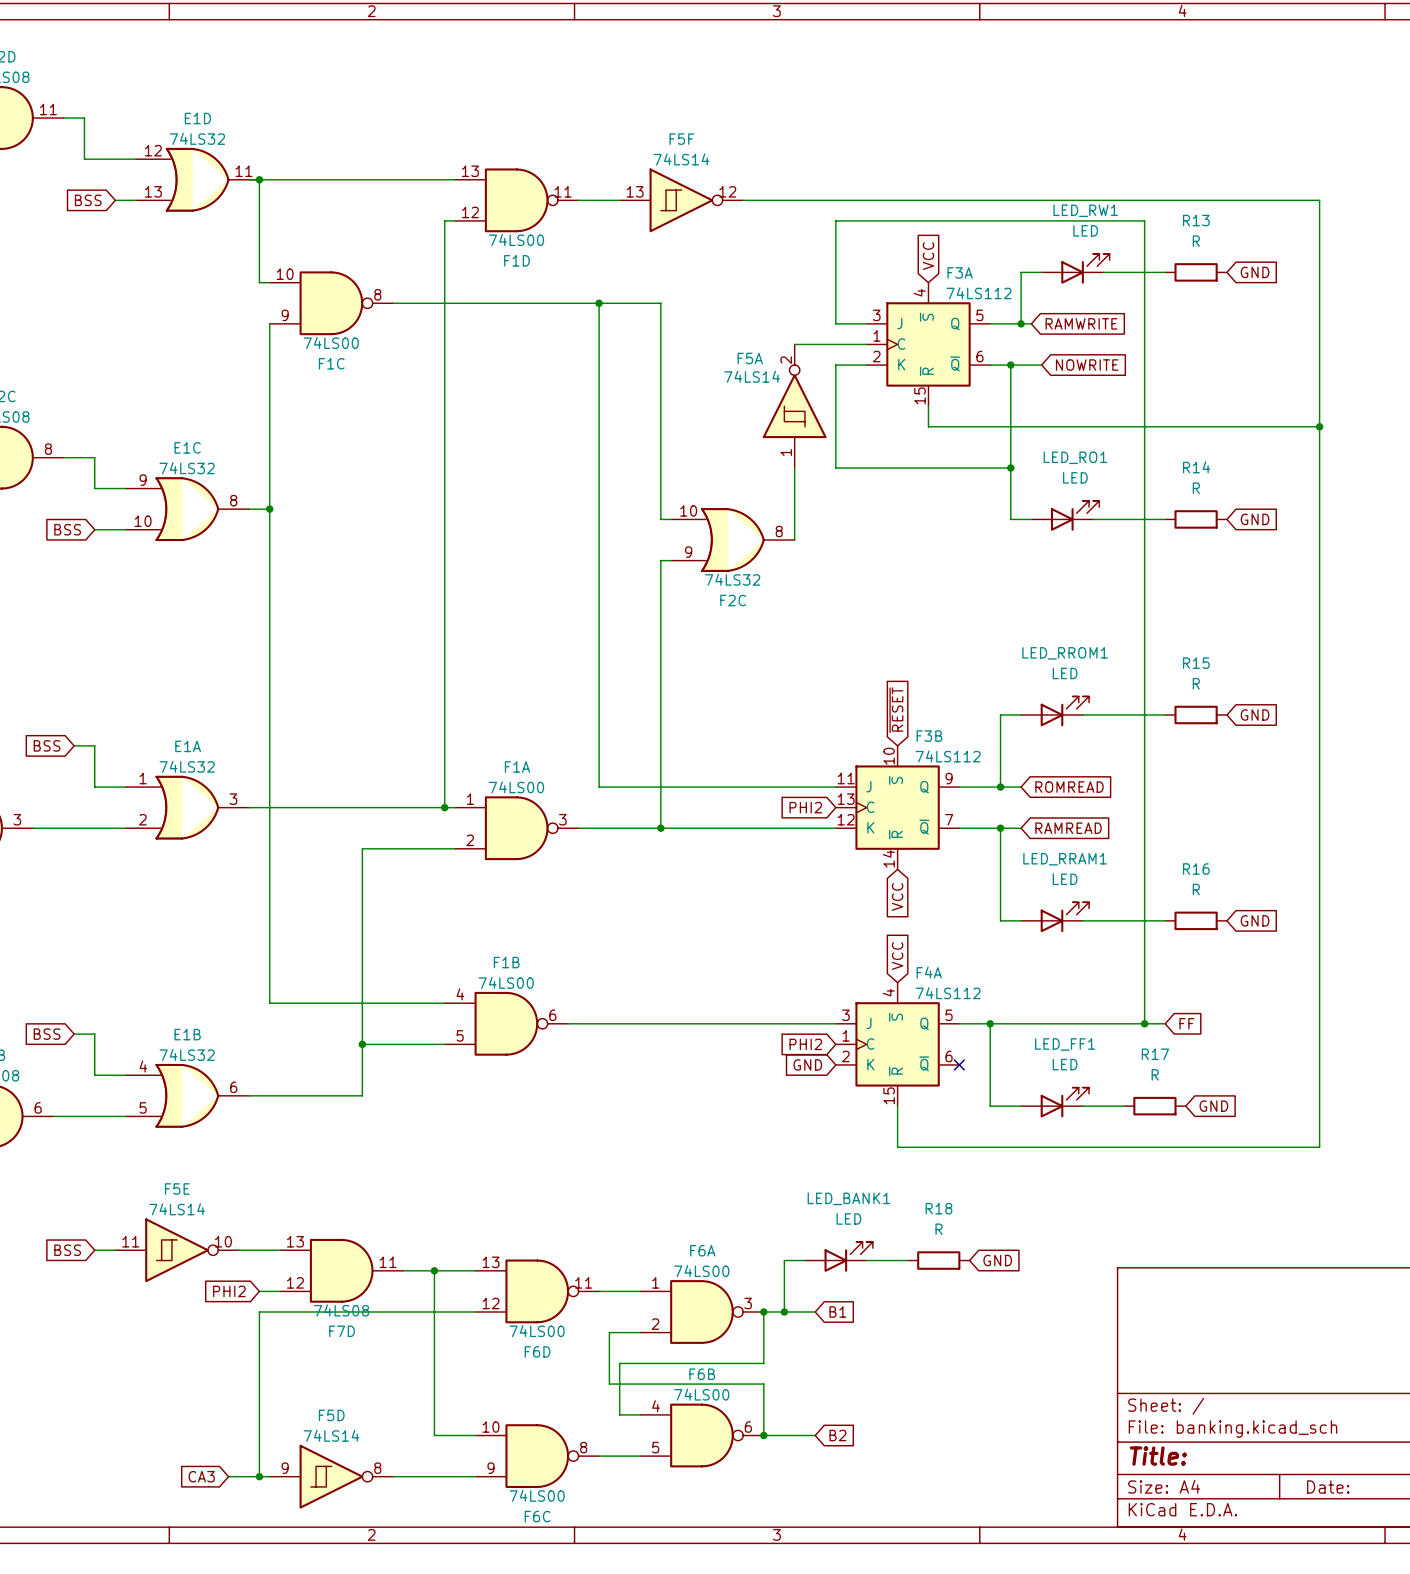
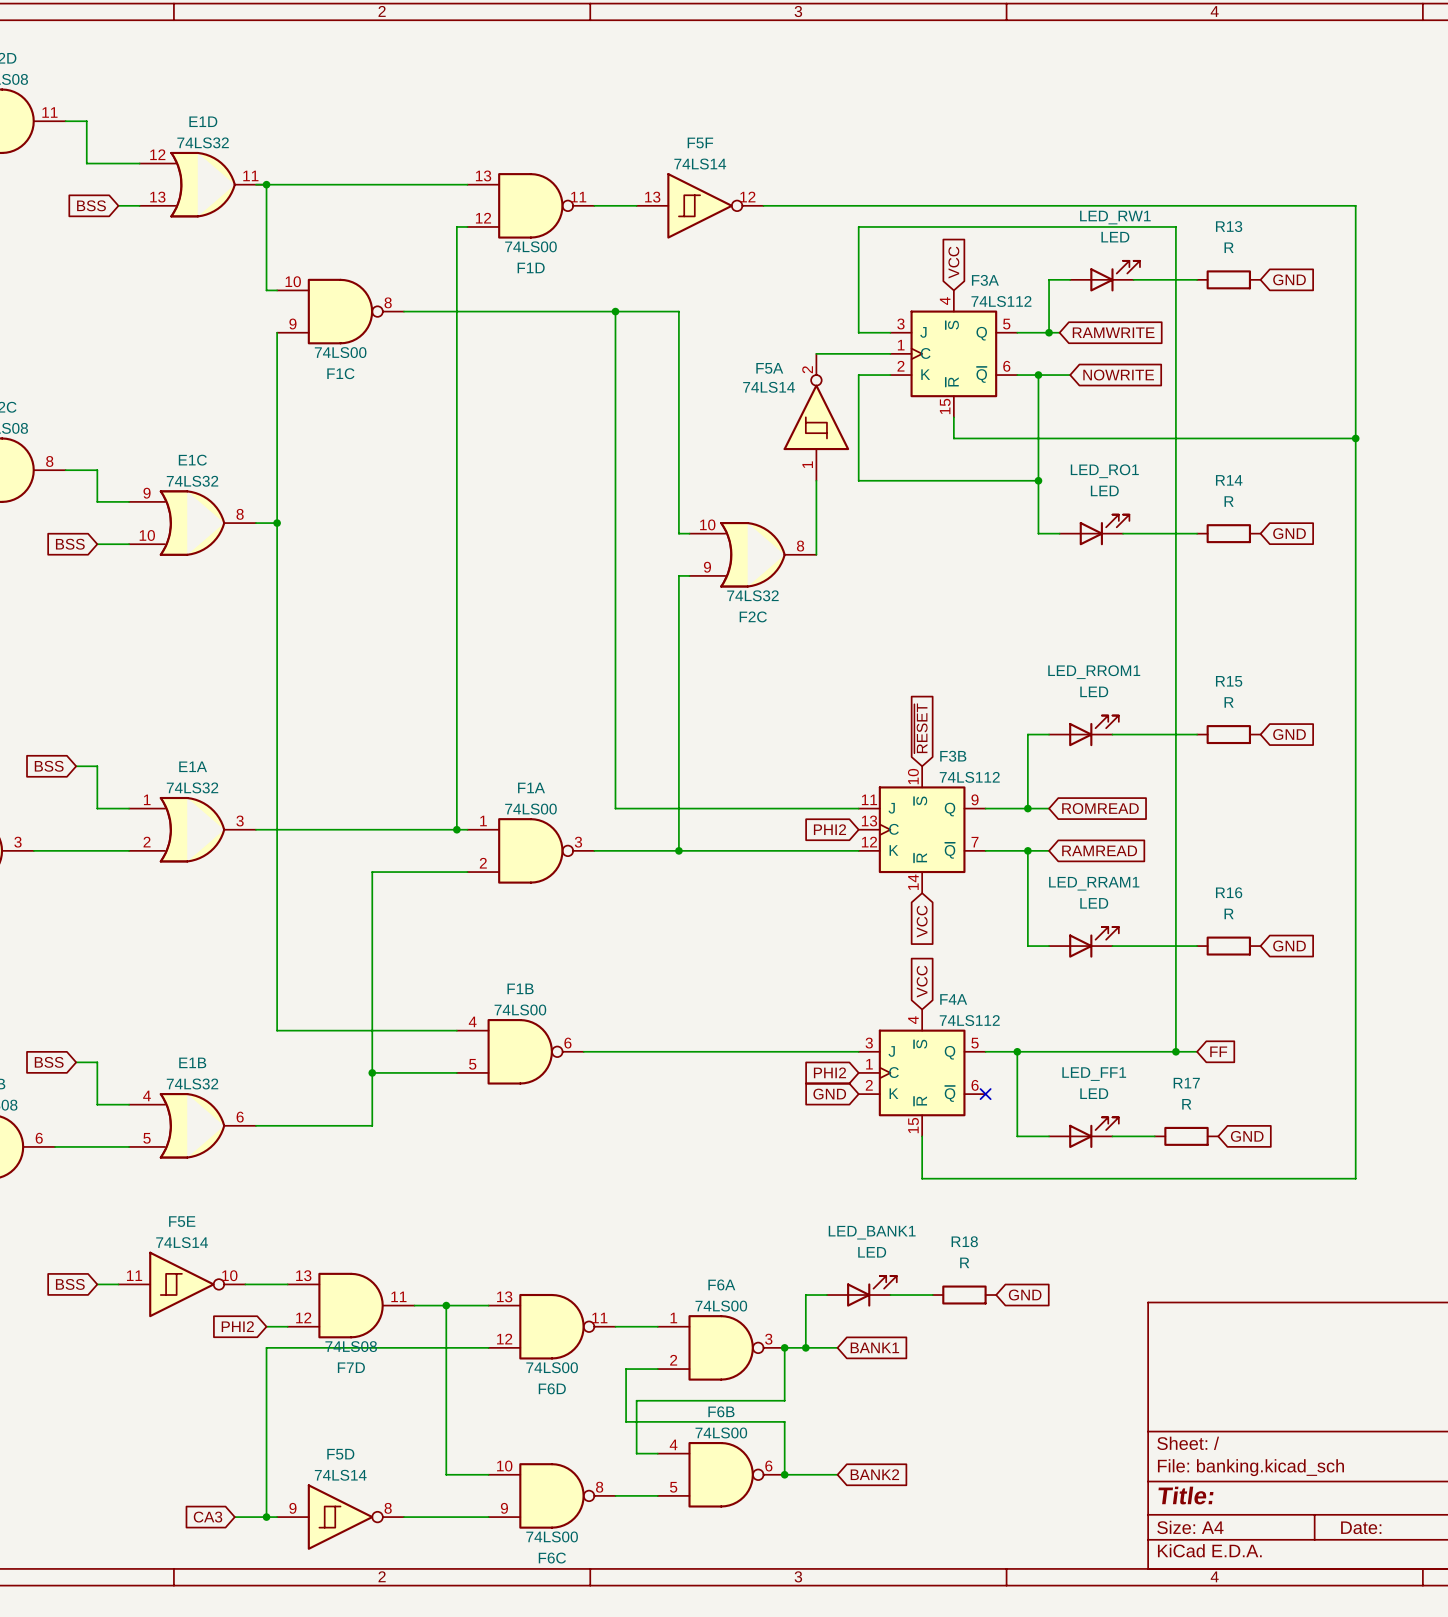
global label: B1 (837, 1312) -> BANK1 (874, 1347)
global label: B2 (837, 1435) -> BANK2 (874, 1474)

